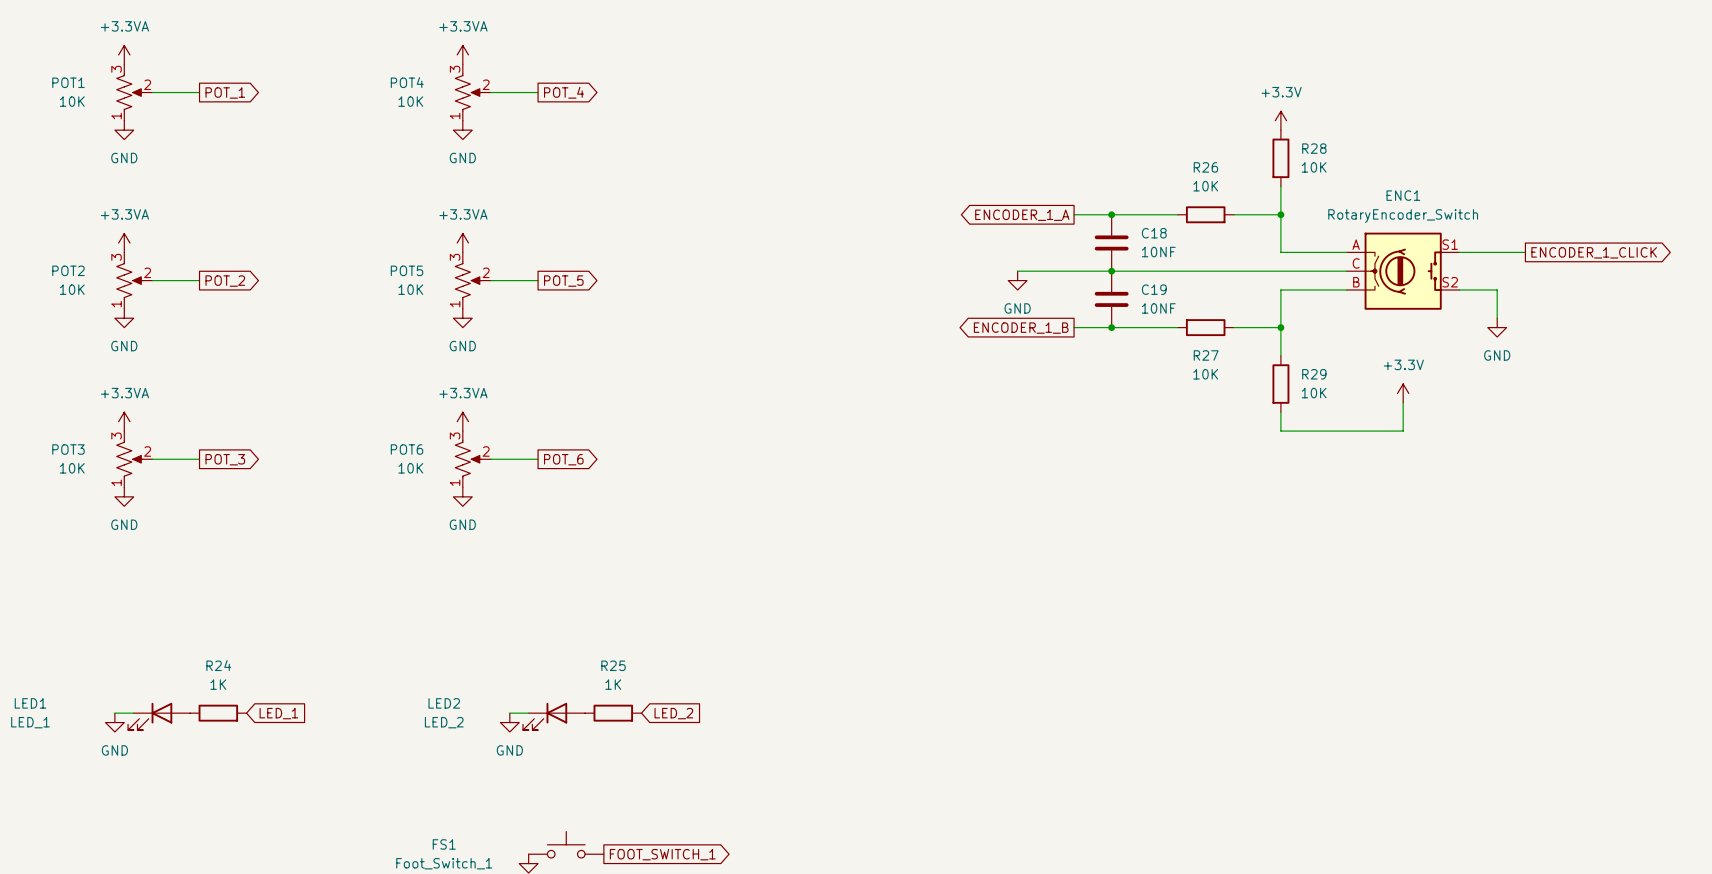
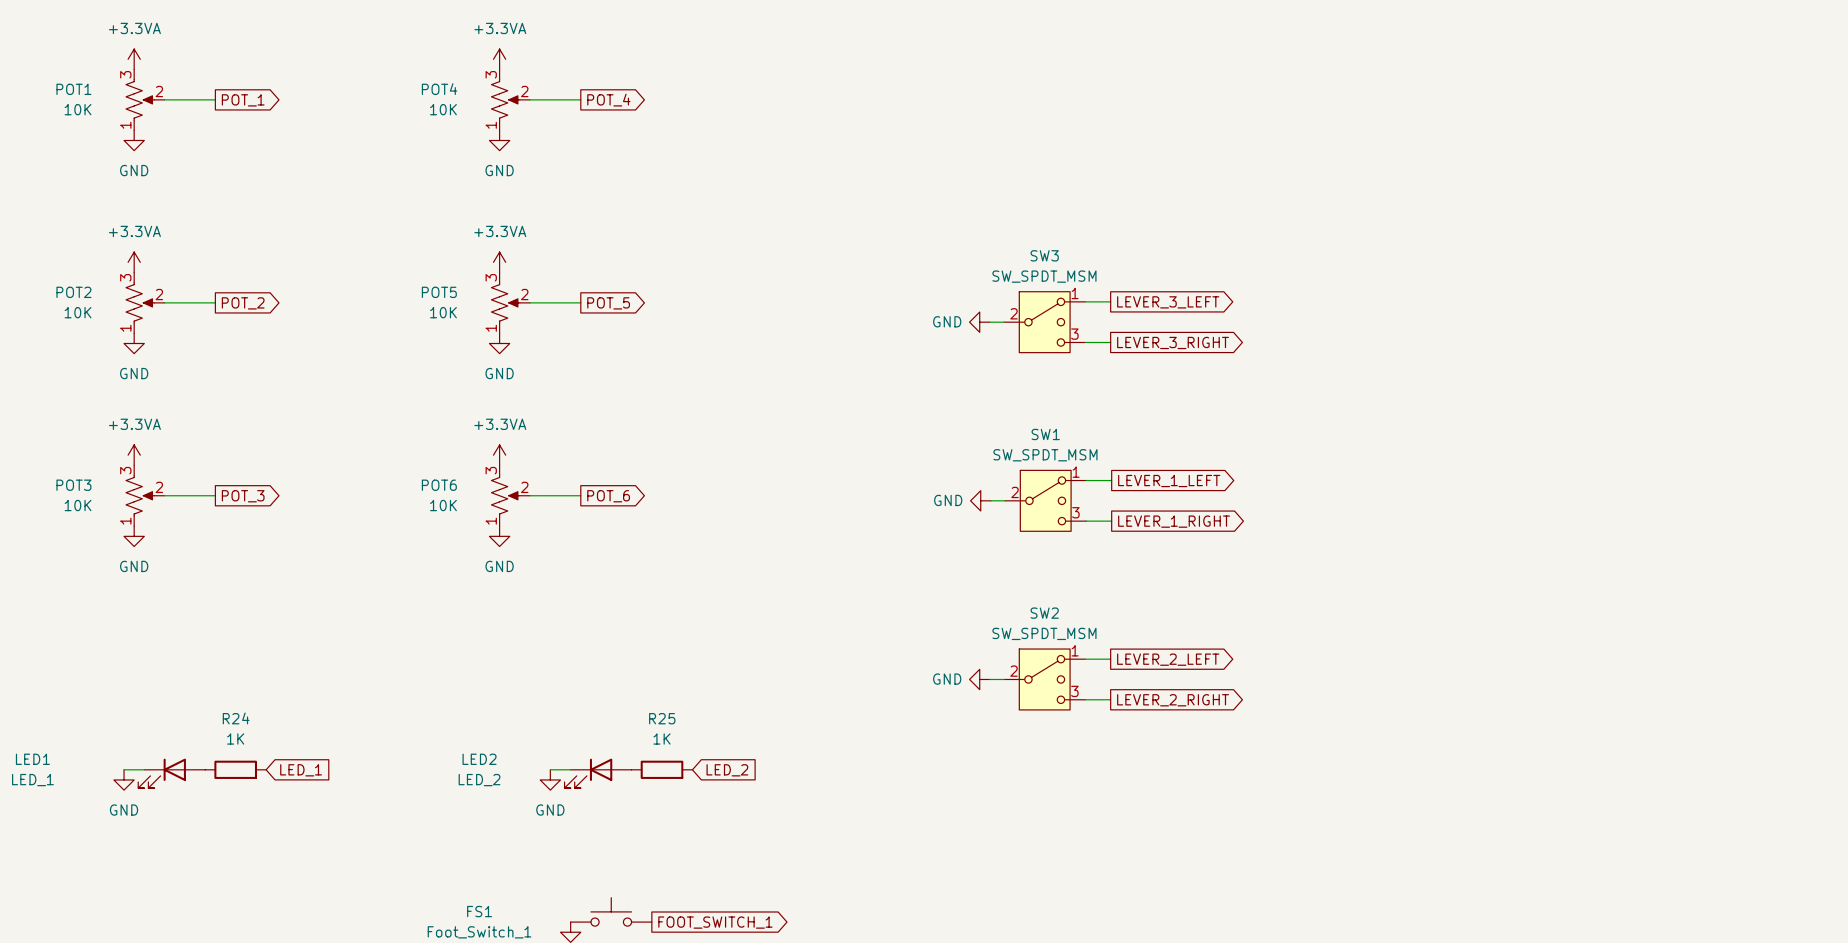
power symbol: +3.3V (1280, 120) -> none
R28: 10K (1280, 158) -> none
wire: (1280, 186) (1280, 252) (1346, 252) -> none
wire: (1074, 214) (1177, 214) -> none
junction: (1111, 214) -> none
R26: 10K (1205, 214) -> none
wire: (1233, 214) (1280, 214) -> none
junction: (1280, 214) -> none
global label: ENCODER_1_A (1022, 215) -> none
C18: 10NF (1111, 242) -> none
wire: (1459, 252) (1525, 252) -> none
global label: ENCODER_1_CLICK (1594, 252) -> none
wire: (1017, 271) (1346, 271) -> none
junction: (1111, 271) -> none
ENC1: RotaryEncoder_Switch (1403, 271) -> none
wire: none -> (1085, 301) (1110, 301)
power symbol: GND (1017, 280) -> none
global label: none -> LEVER_3_LEFT (1168, 302)
wire: (1346, 290) (1280, 290) (1280, 355) -> none
wire: (1459, 290) (1497, 290) (1497, 318) -> none
power symbol: none -> GND (979, 322)
wire: none -> (989, 322) (1004, 322)
SW3: none -> SW_SPDT_MSM (1044, 322)
C19: 10NF (1111, 299) -> none
wire: none -> (1085, 342) (1110, 342)
global label: none -> LEVER_3_RIGHT (1173, 342)
wire: (1074, 327) (1177, 327) -> none
junction: (1111, 327) -> none
R27: 10K (1205, 327) -> none
wire: (1233, 327) (1280, 327) -> none
junction: (1280, 327) -> none
power symbol: GND (1497, 327) -> none
global label: ENCODER_1_B (1021, 328) -> none
R29: 10K (1280, 384) -> none
power symbol: +3.3V (1403, 393) -> none
wire: (1403, 402) (1403, 431) (1280, 431) (1280, 412) -> none
wire: none -> (1086, 480) (1111, 480)
global label: none -> LEVER_1_LEFT (1169, 481)
power symbol: none -> GND (980, 500)
wire: none -> (990, 500) (1005, 500)
SW1: none -> SW_SPDT_MSM (1045, 500)
wire: none -> (1086, 521) (1111, 521)
global label: none -> LEVER_1_RIGHT (1174, 521)
wire: none -> (1085, 659) (1110, 659)
global label: none -> LEVER_2_LEFT (1168, 659)
power symbol: none -> GND (979, 679)
wire: none -> (989, 679) (1004, 679)
SW2: none -> SW_SPDT_MSM (1044, 679)
wire: none -> (1085, 699) (1110, 699)
global label: none -> LEVER_2_RIGHT (1173, 700)

